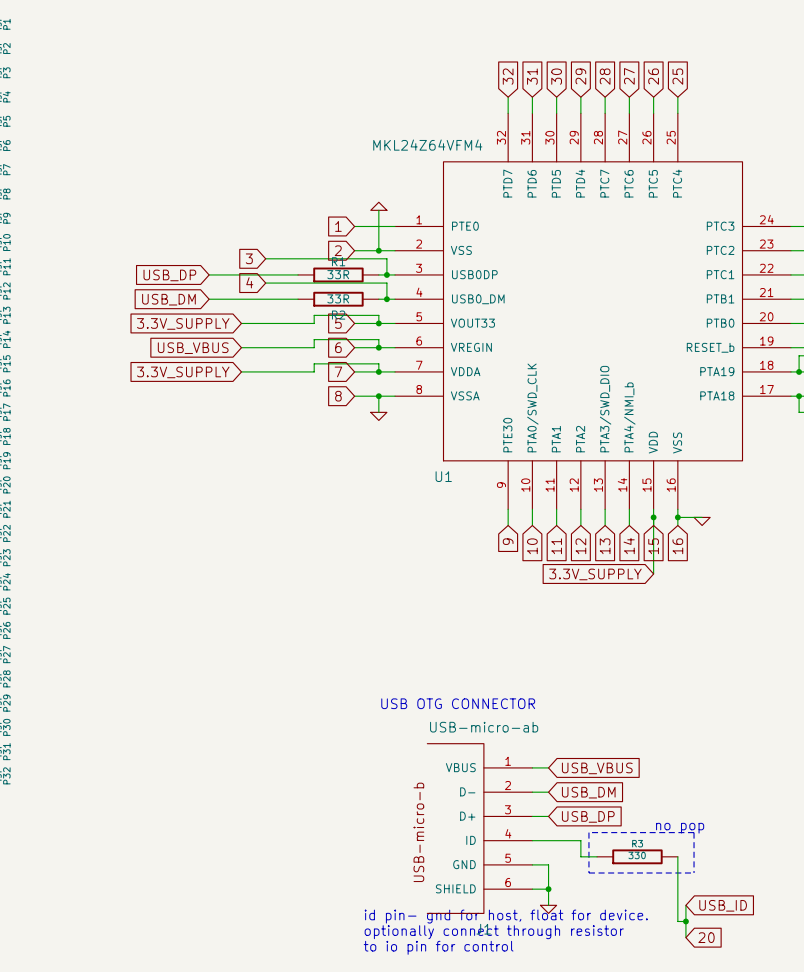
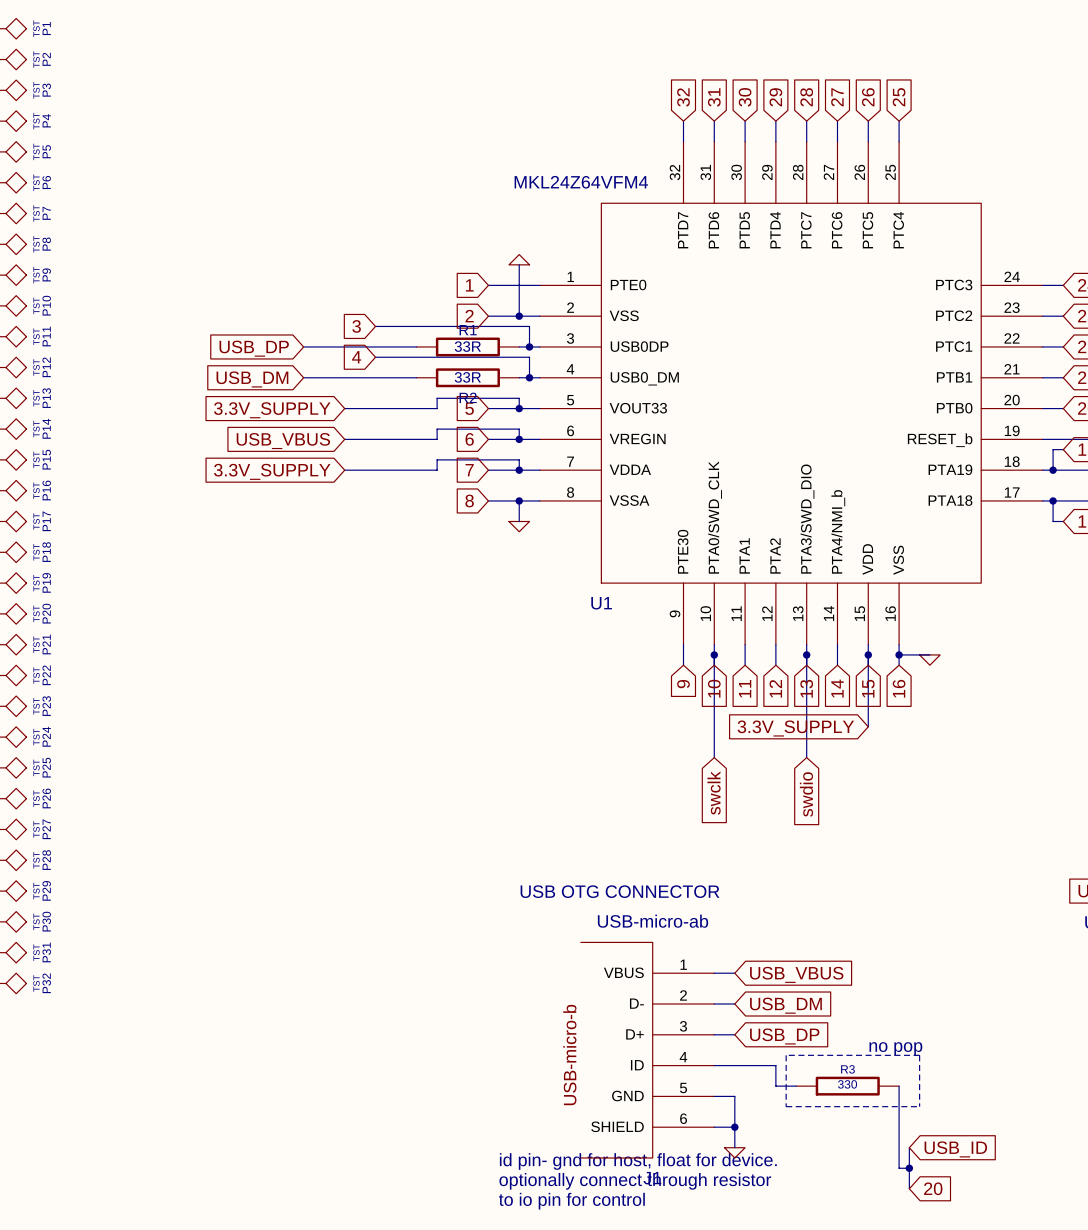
junction: none -> (714, 654)
junction: none -> (806, 654)
wire: none -> (714, 665) (714, 757)
wire: none -> (806, 665) (806, 757)
global label: none -> swclk (714, 793)
global label: none -> swdio (806, 794)

